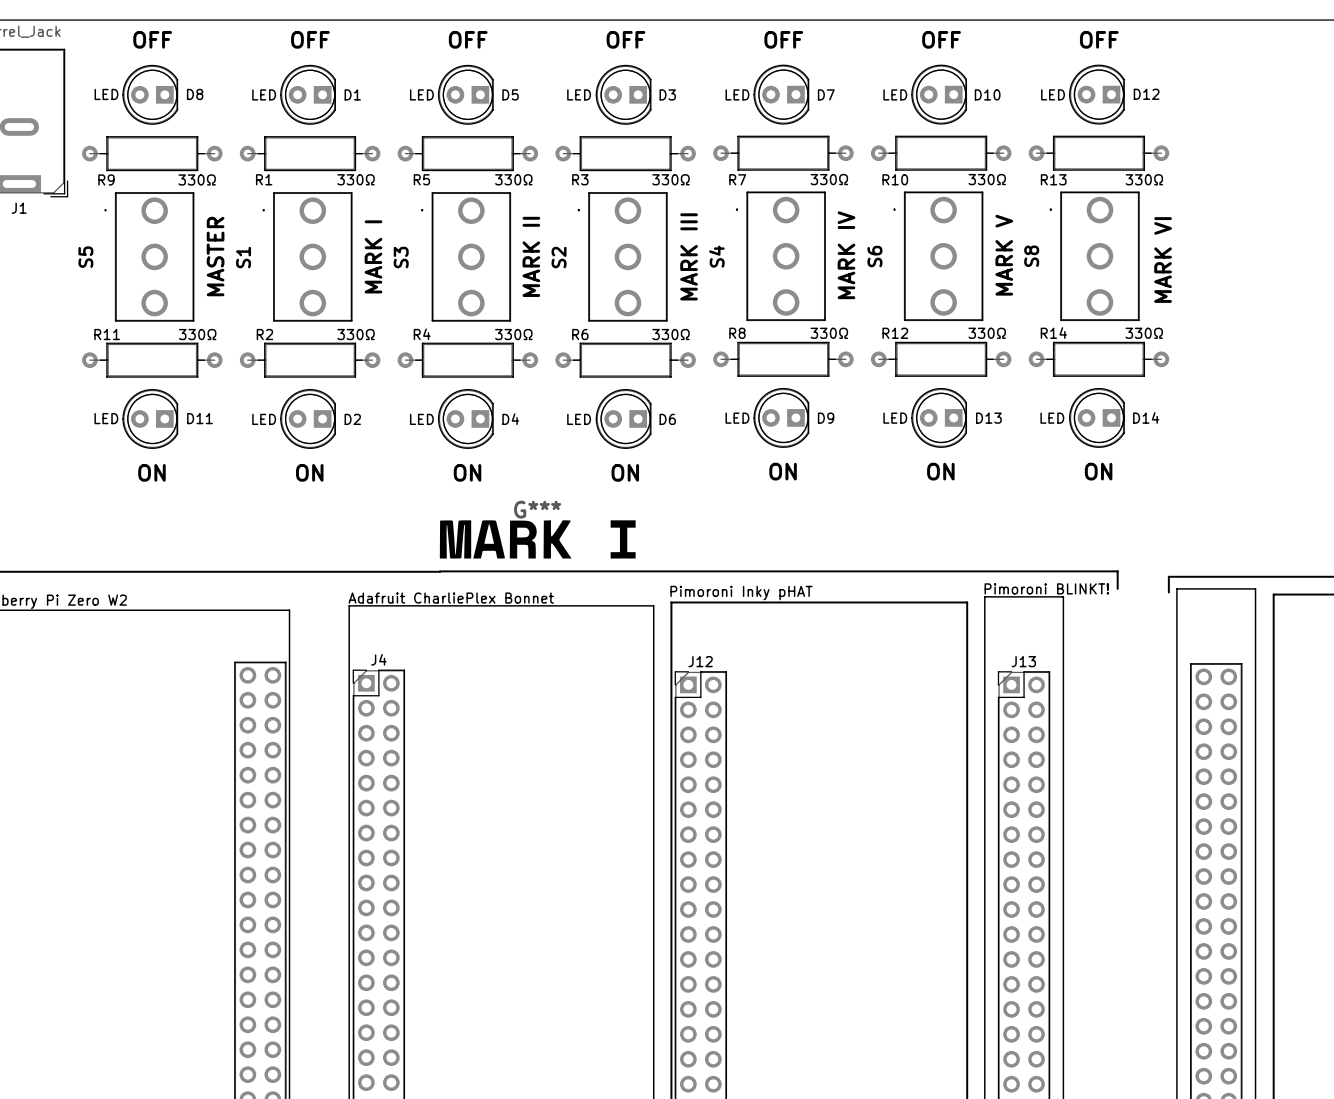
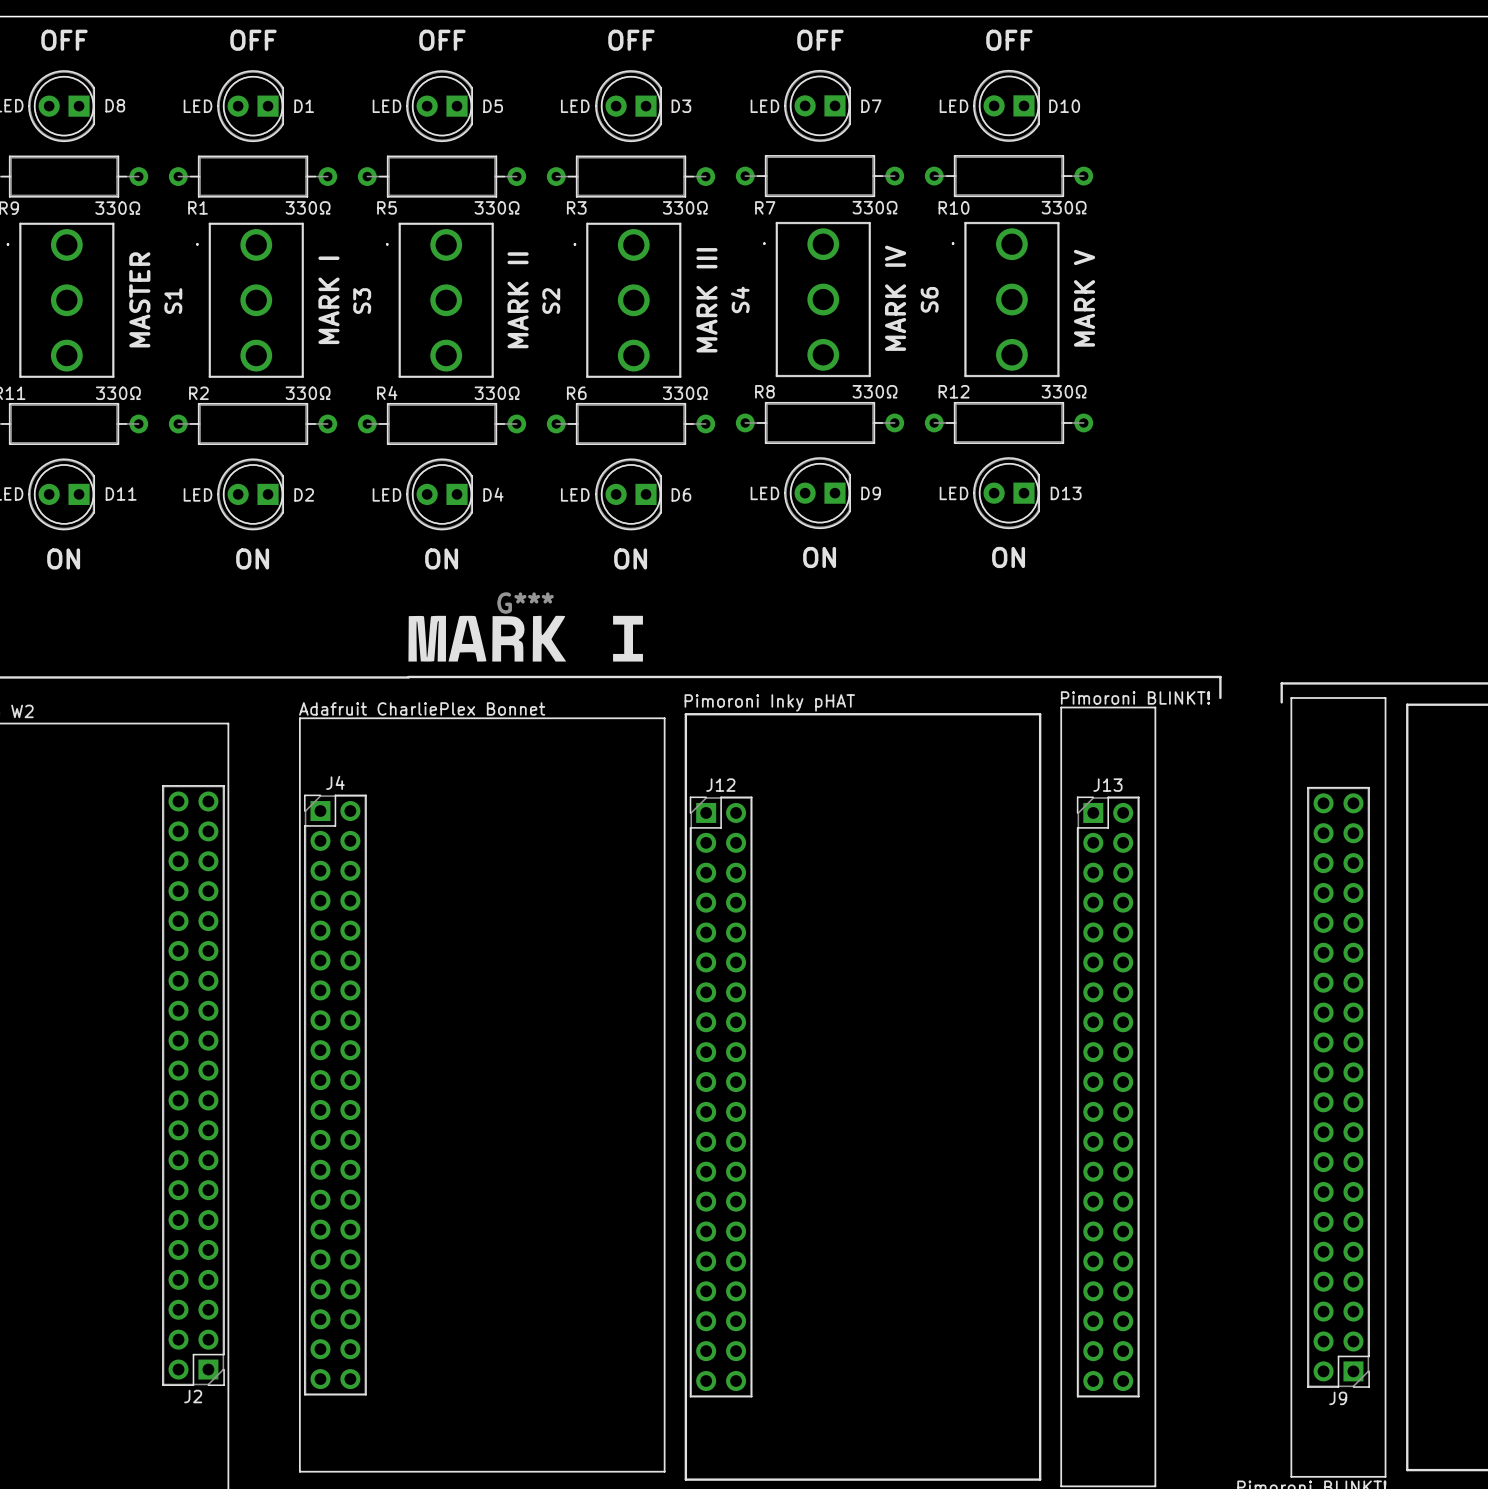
text: OFF (1099, 39) -> none
D12: LED (1096, 94) -> none
R13: 330Ω (1098, 153) -> none
S8: (1094, 256) -> none
text: MARK VI (1163, 260) -> none
R14: 330Ω (1098, 359) -> none
D14: LED (1096, 417) -> none
text: ON (1098, 471) -> none

